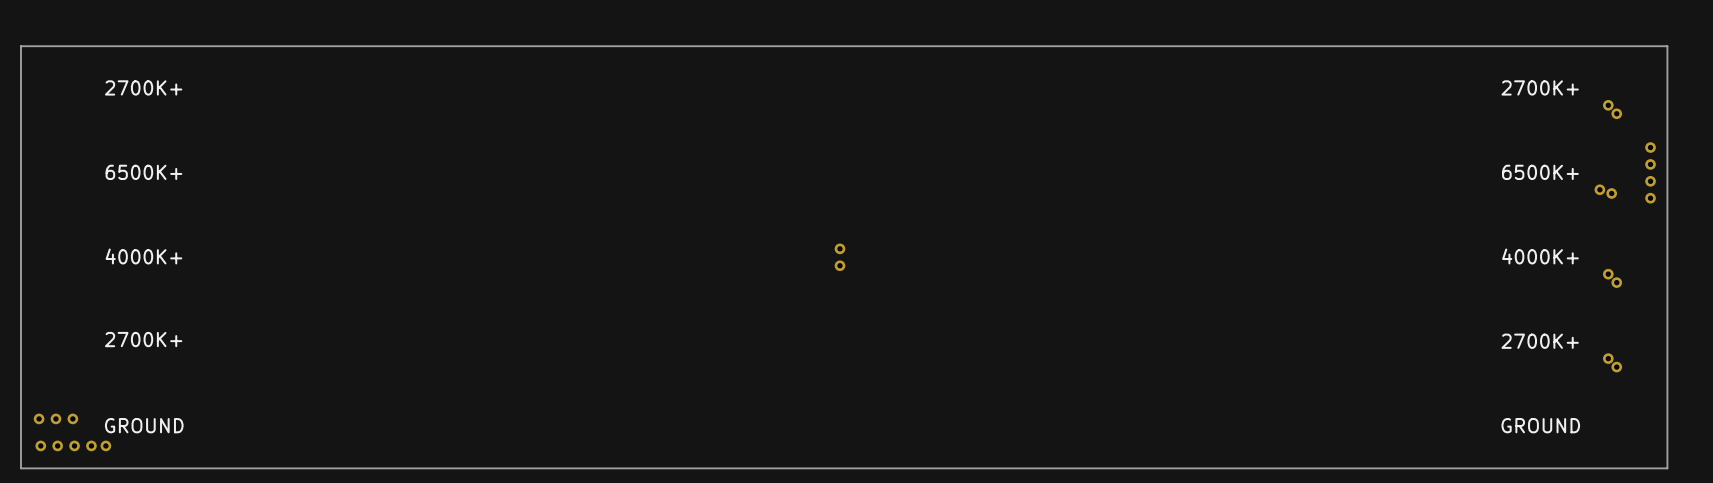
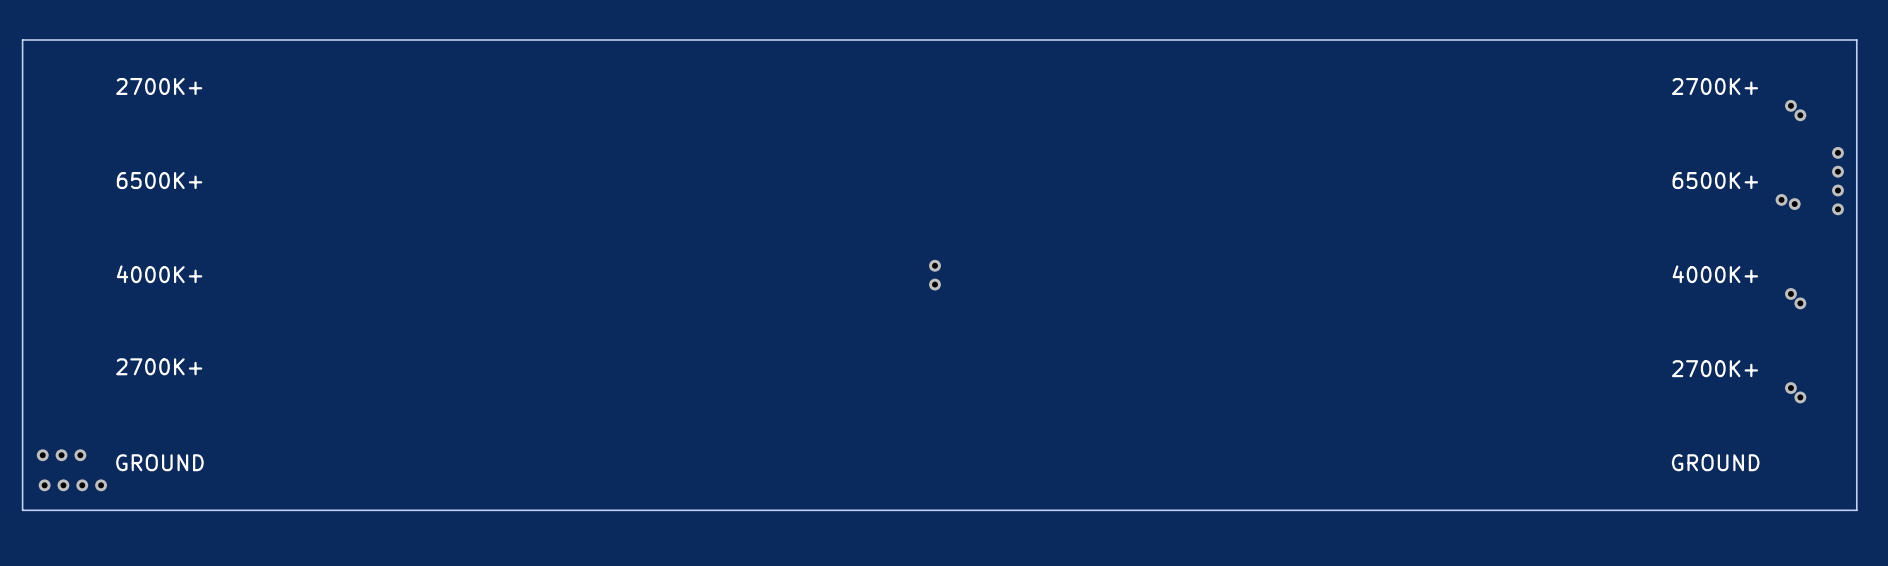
via: (105, 445) -> none

